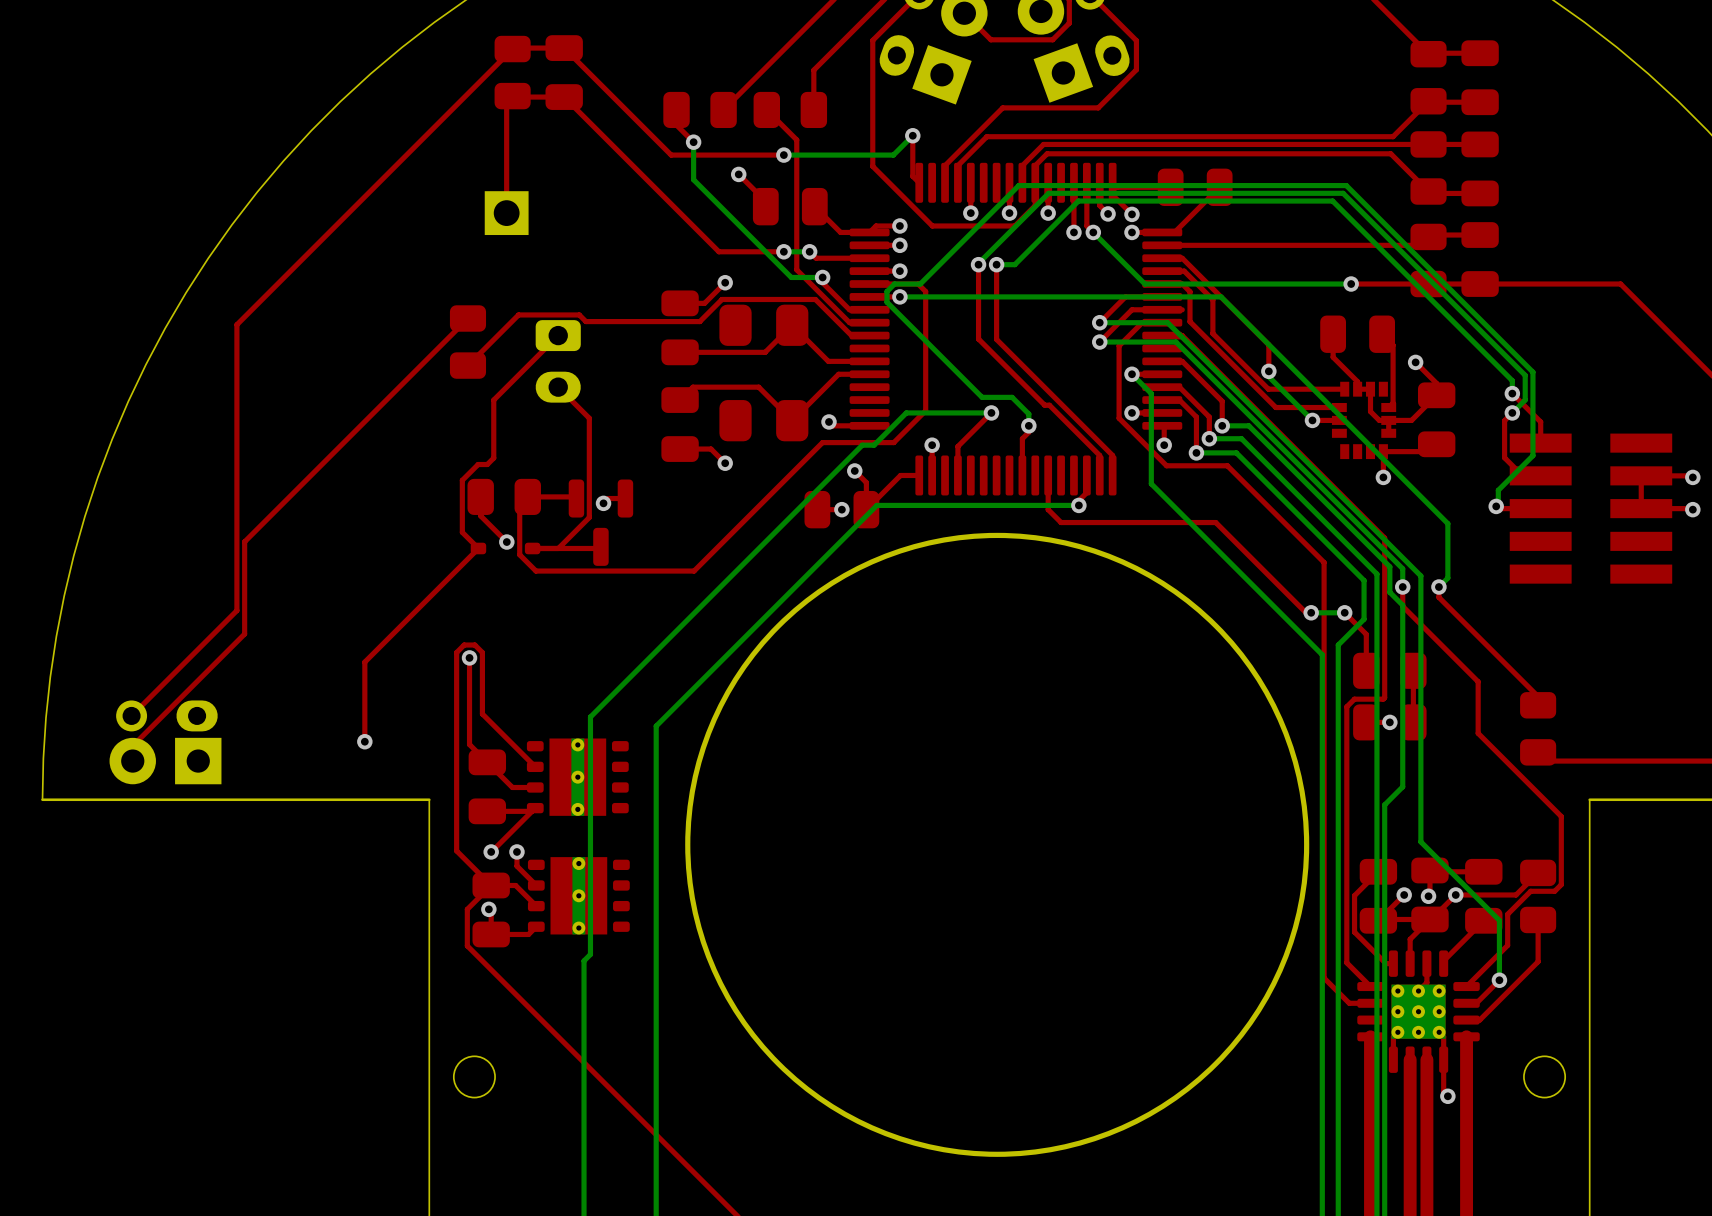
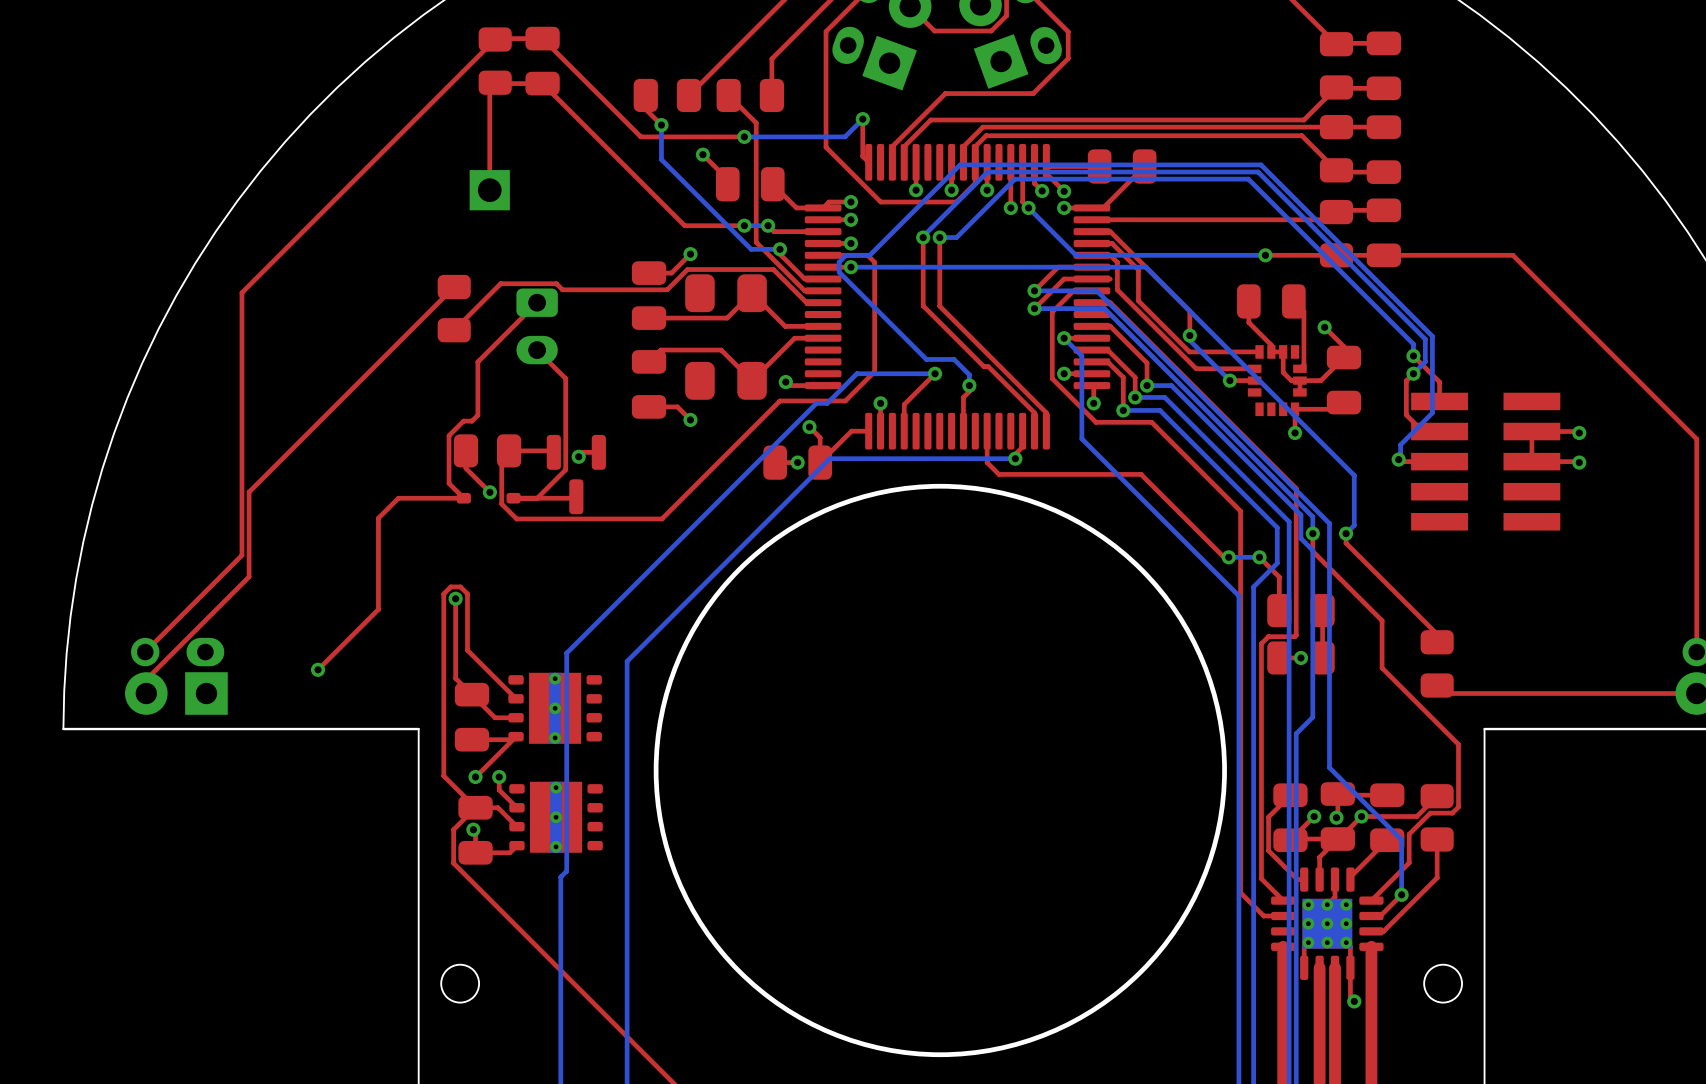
top track: (478, 548) (364, 662) (364, 741) -> (463, 498) (398, 498) (378, 518) (378, 609) (318, 669)
via position: (364, 741) -> (318, 669)

